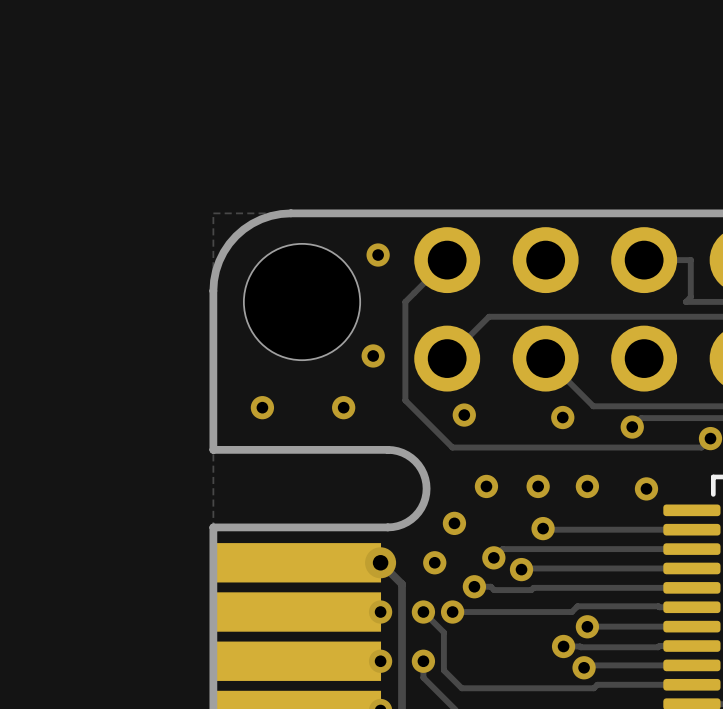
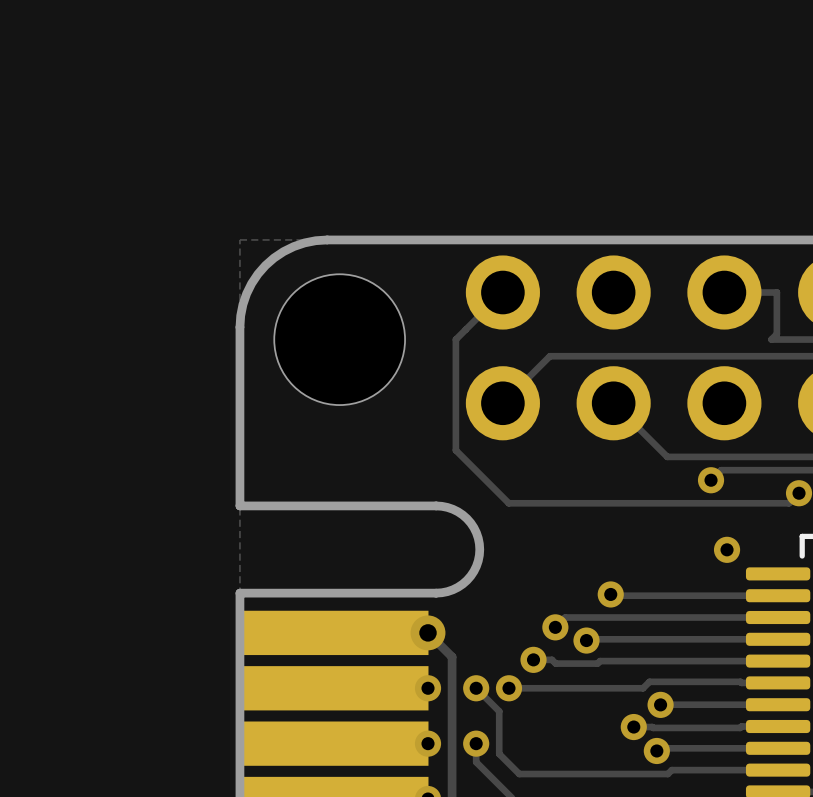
via: (378, 255) -> none
via: (373, 355) -> none
via: (262, 407) -> none
via: (343, 407) -> none
via: (464, 415) -> none
via: (562, 417) -> none
via: (486, 486) -> none
via: (538, 486) -> none
via: (587, 486) -> none
via: (454, 523) -> none
via: (434, 562) -> none

